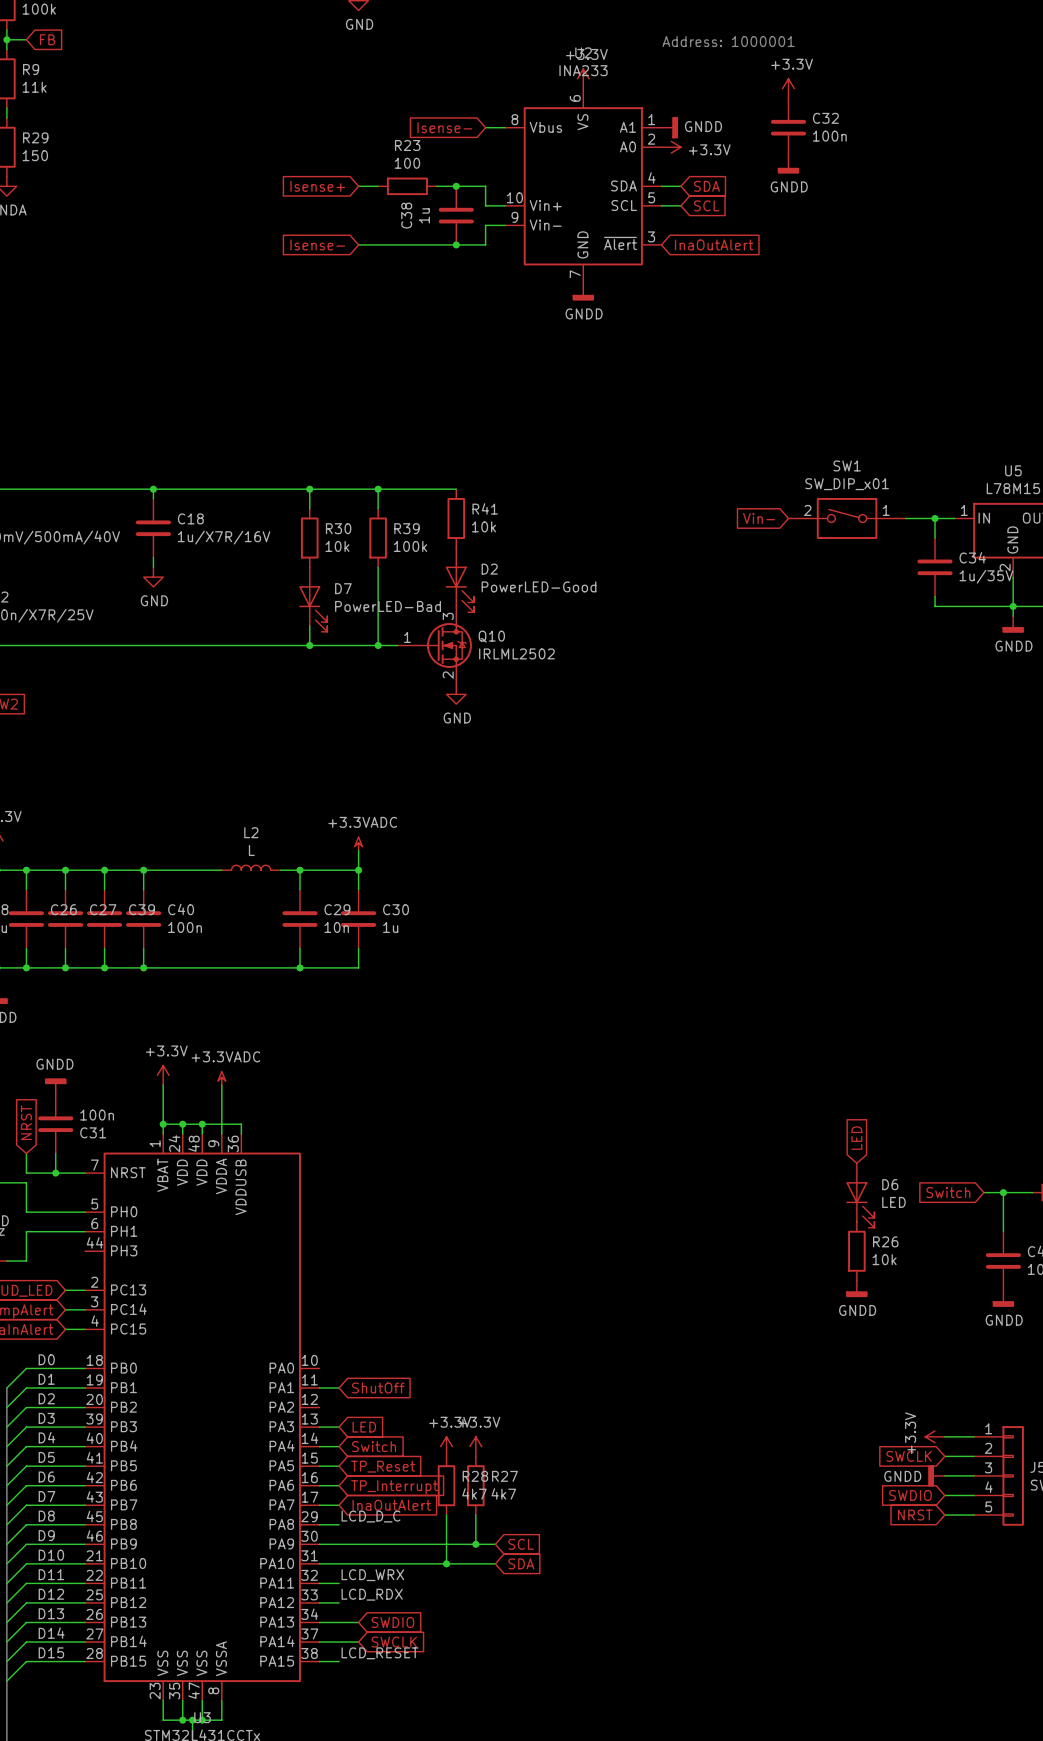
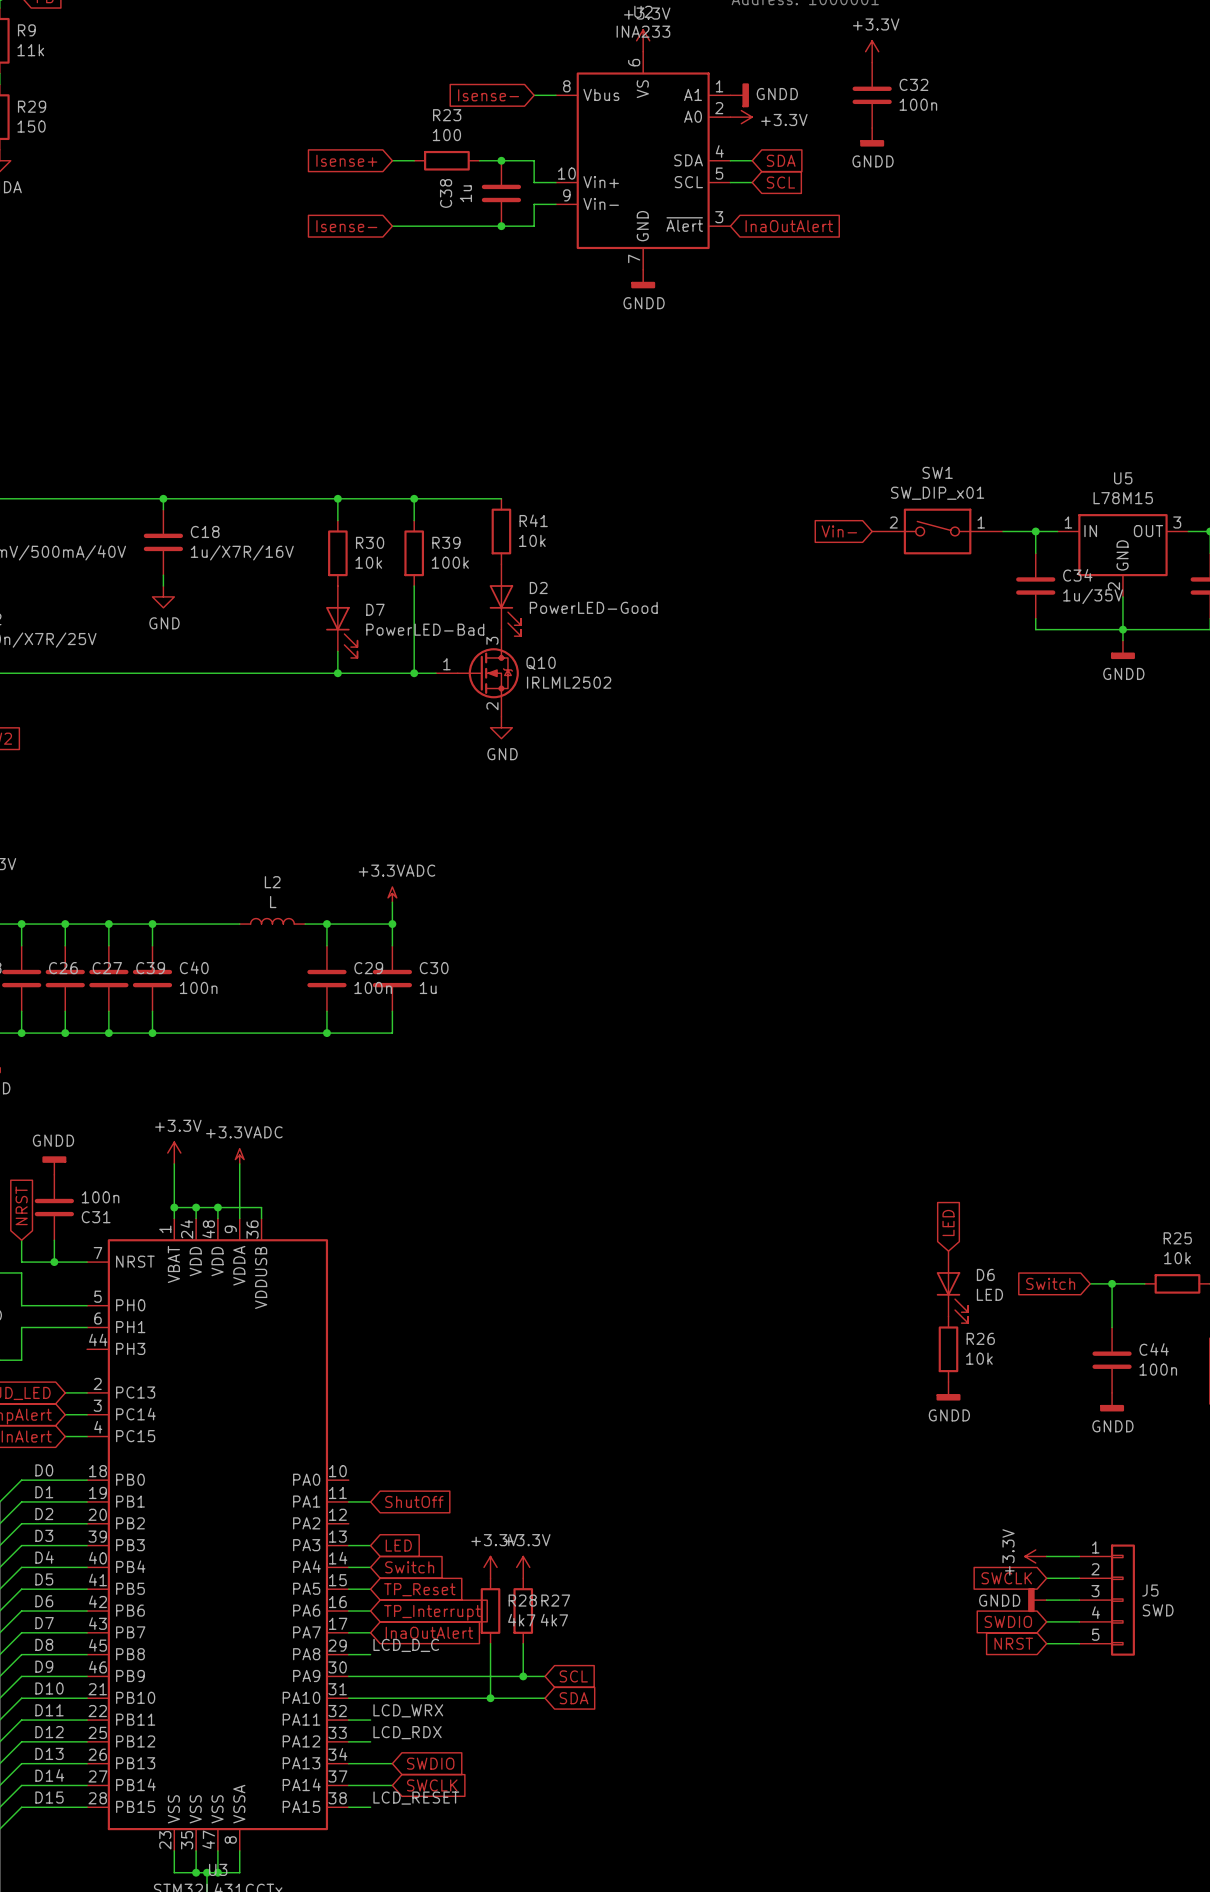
C29 value: 10n (336, 927) -> 100n (373, 987)

